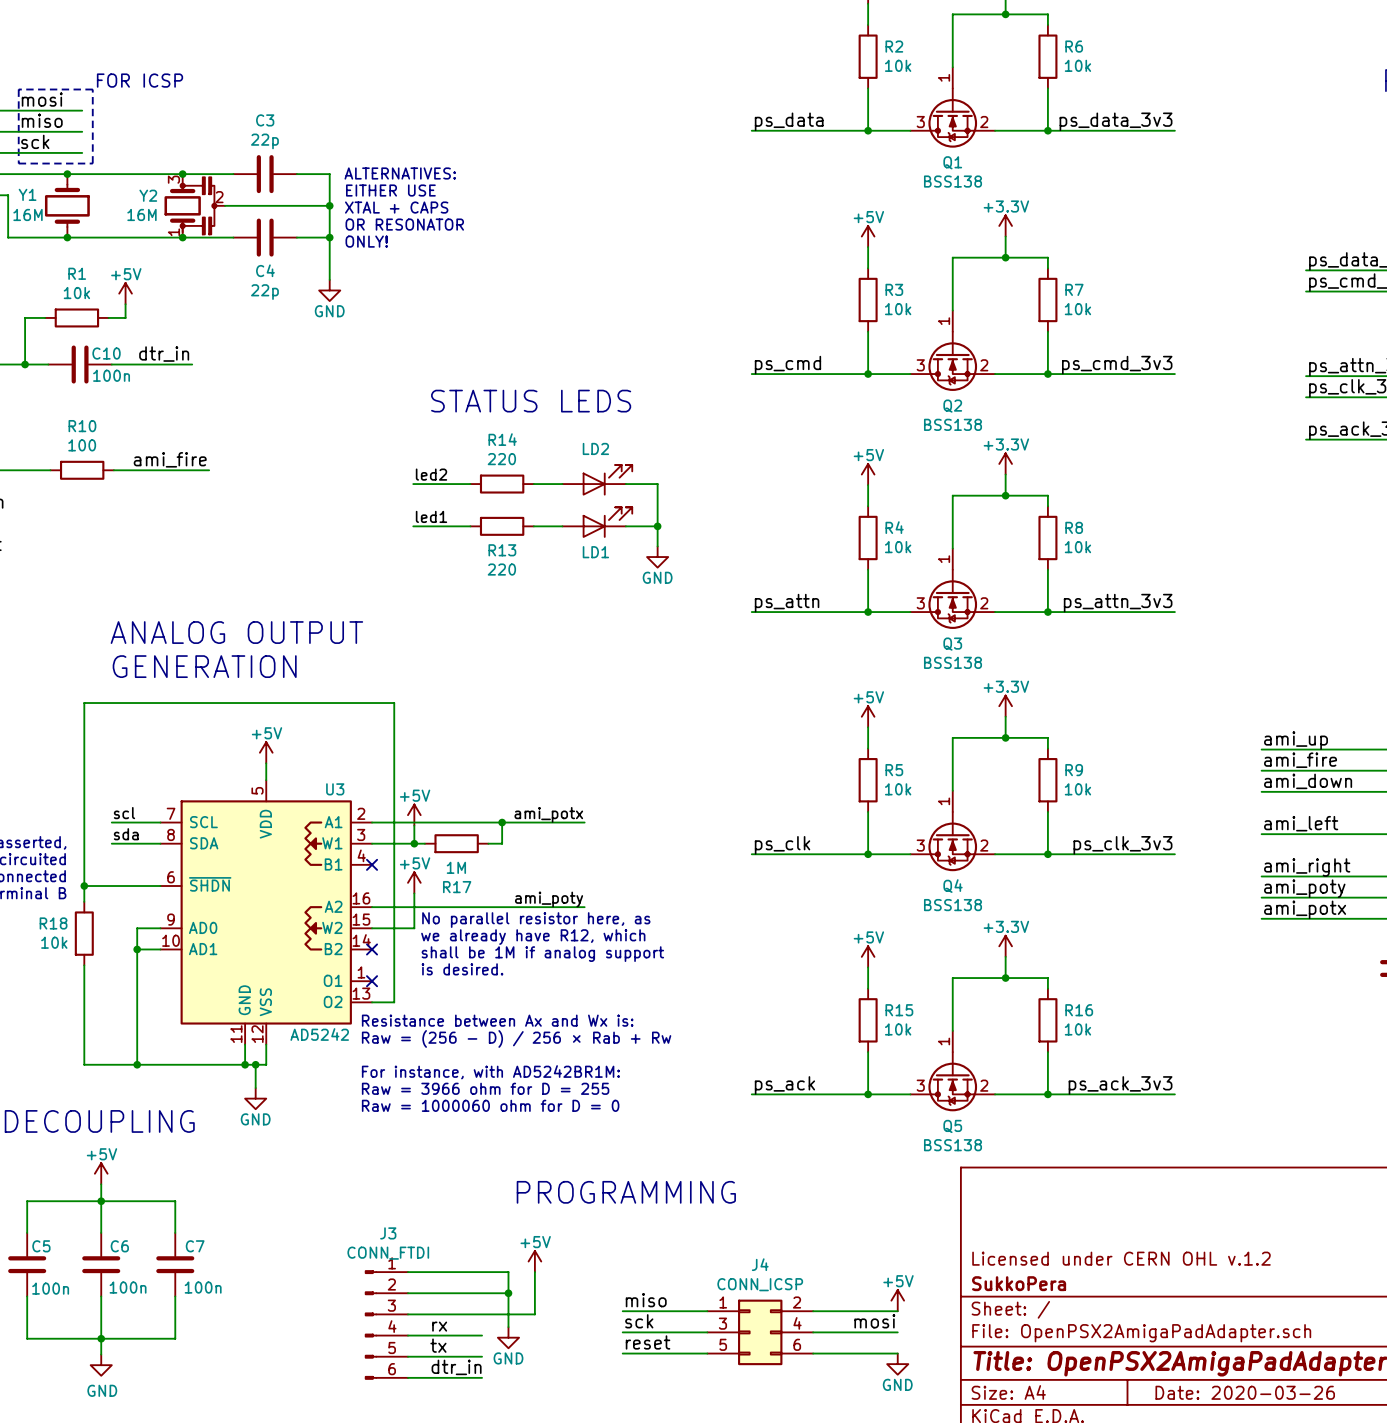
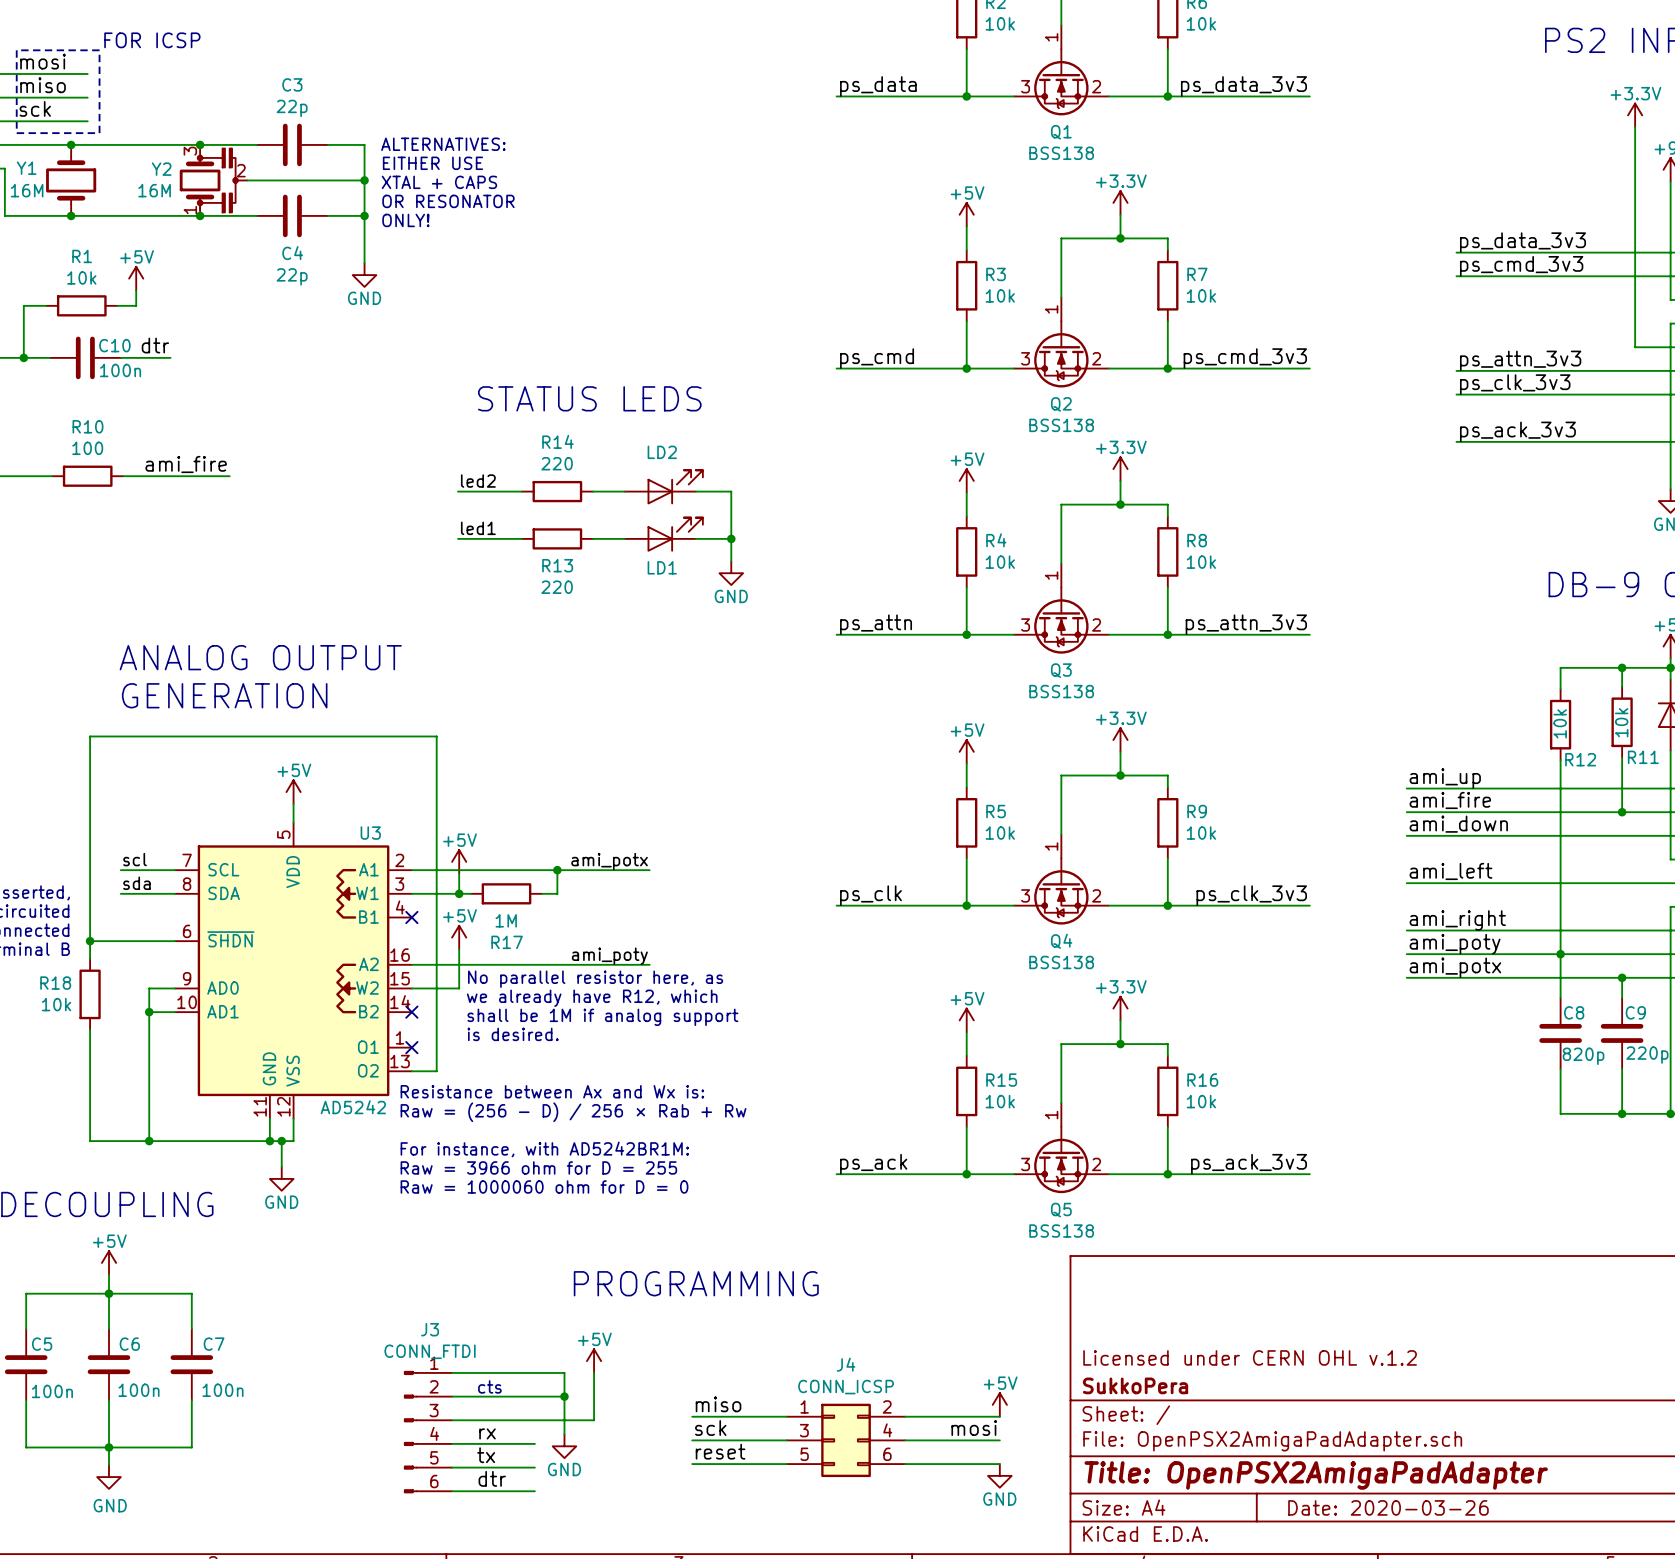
label: dtr_in (164, 354) -> dtr (155, 345)
wire: (156, 364) (192, 364) -> none
text: none -> cts (489, 1386)
label: dtr_in (456, 1367) -> dtr (492, 1478)

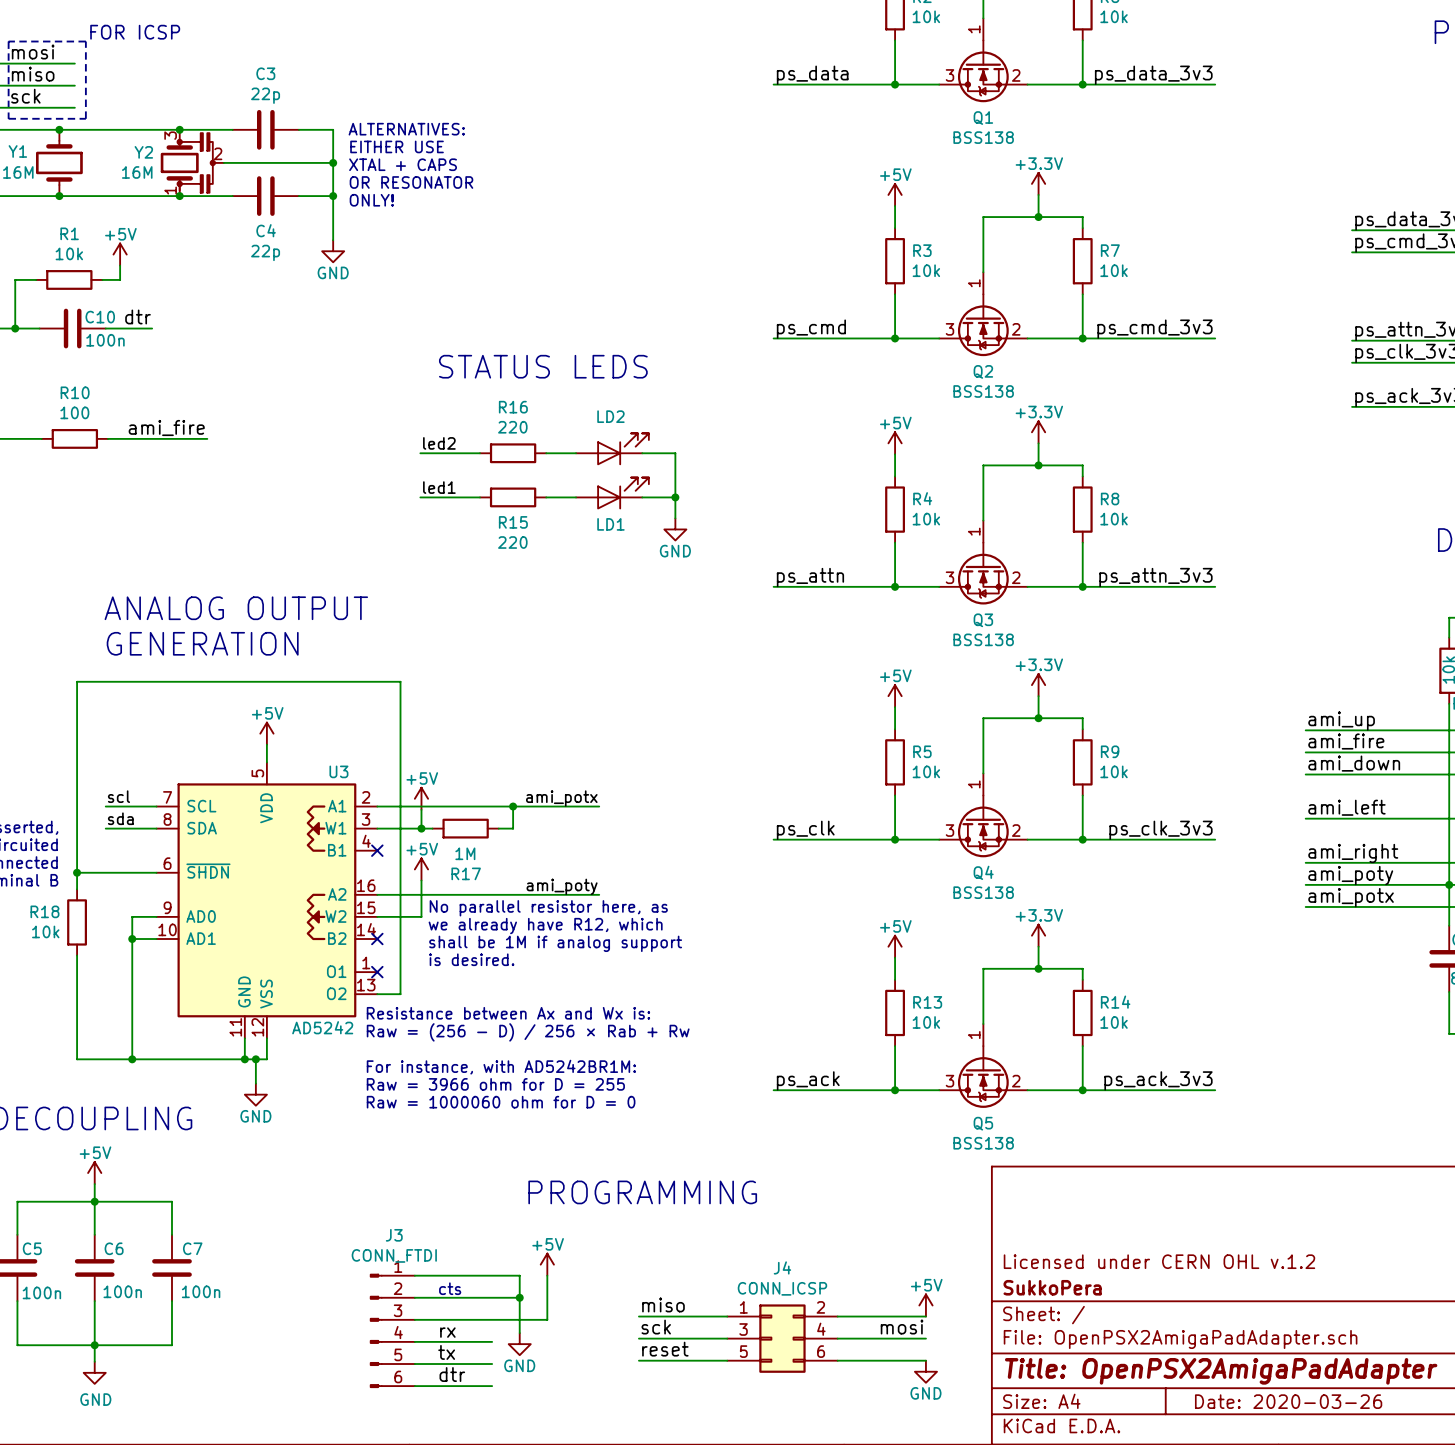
R14 name: R14 (557, 441) -> R16 (513, 407)
R13 name: R13 (557, 565) -> R15 (513, 522)
R15 name: R15 (1001, 1080) -> R13 (927, 1002)
R16 name: R16 (1202, 1080) -> R14 (1115, 1002)

